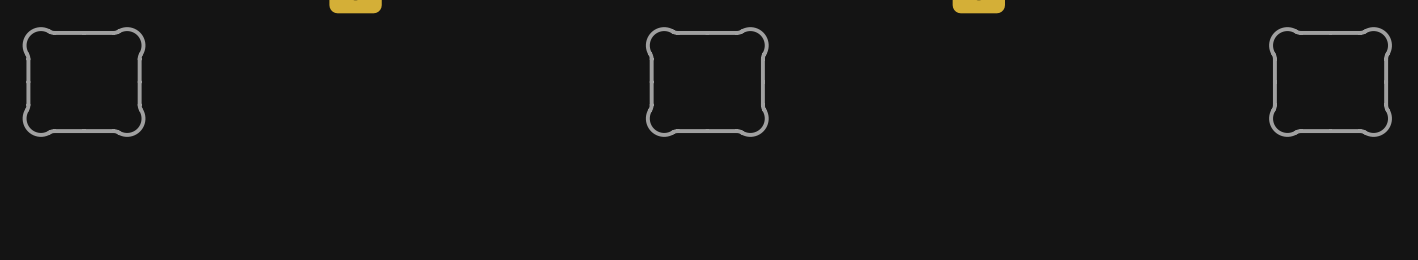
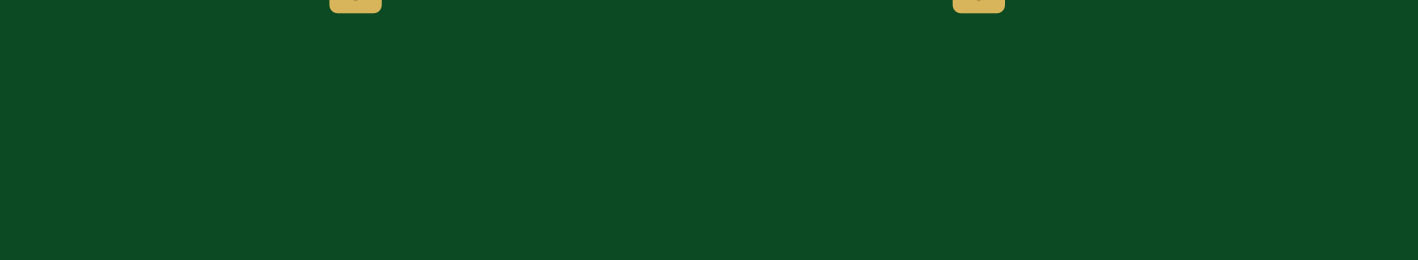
part: (84, 82) -> none
part: (707, 82) -> none
part: (1330, 82) -> none

